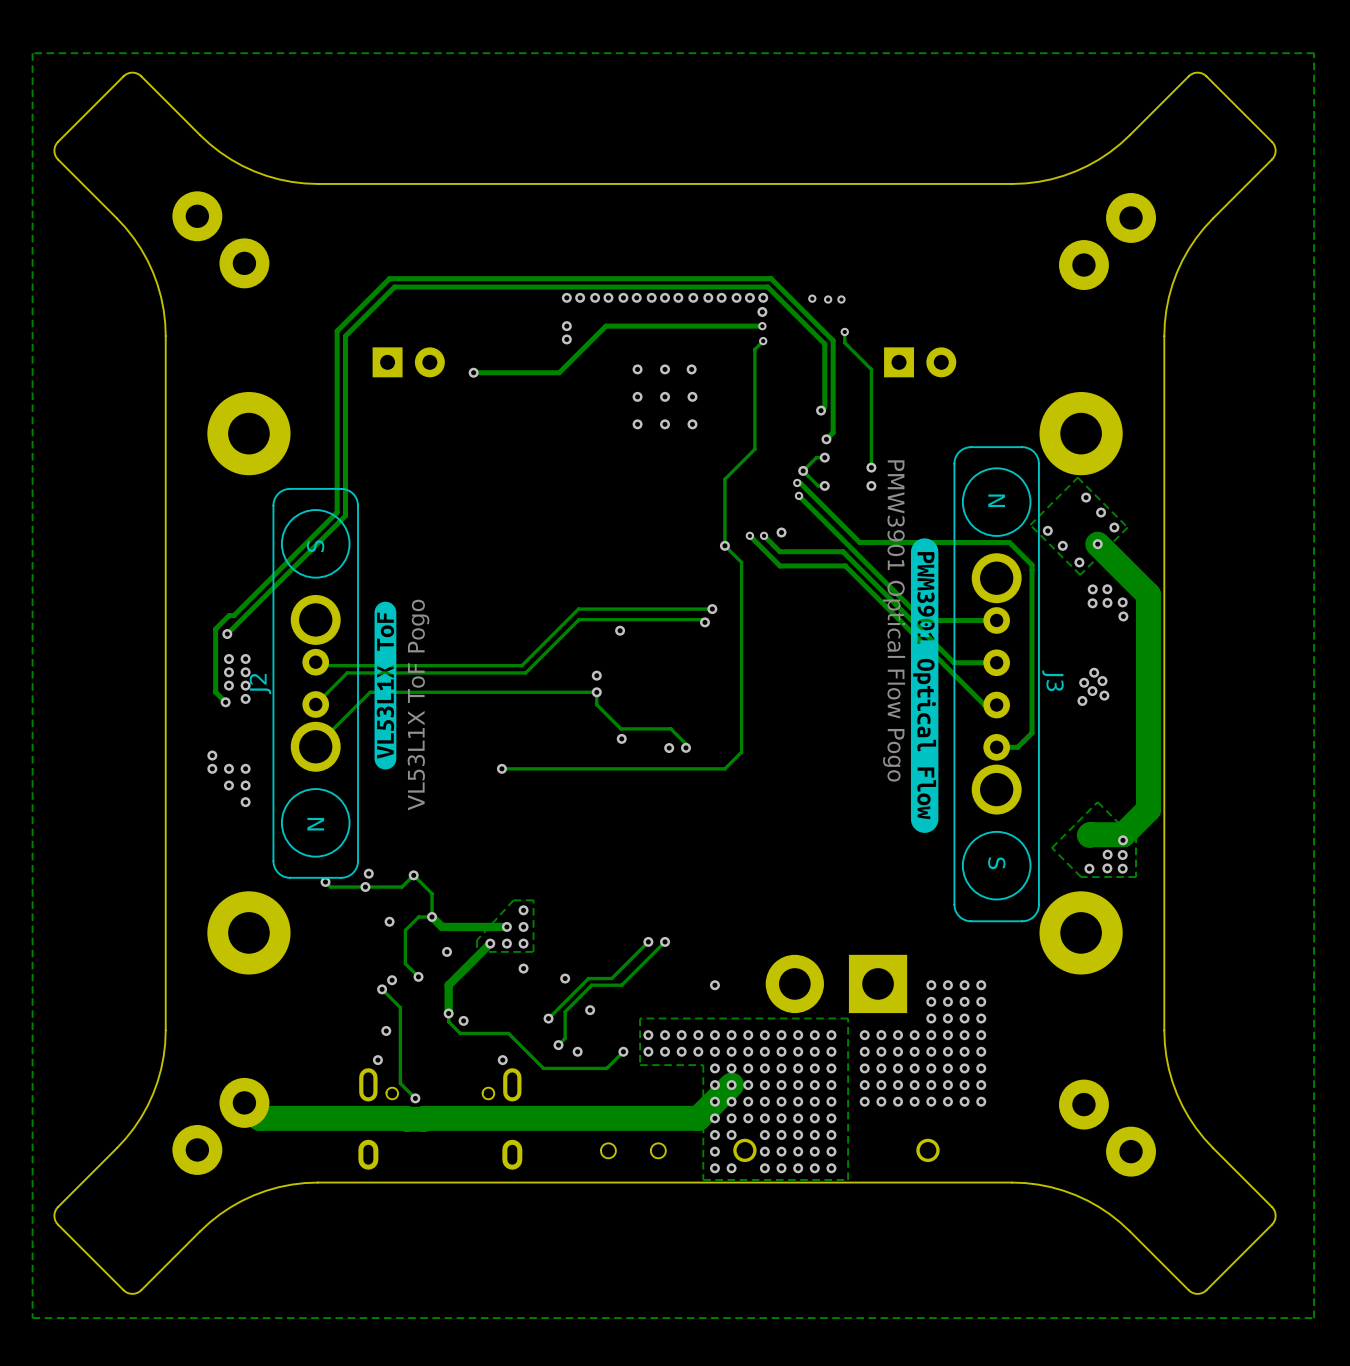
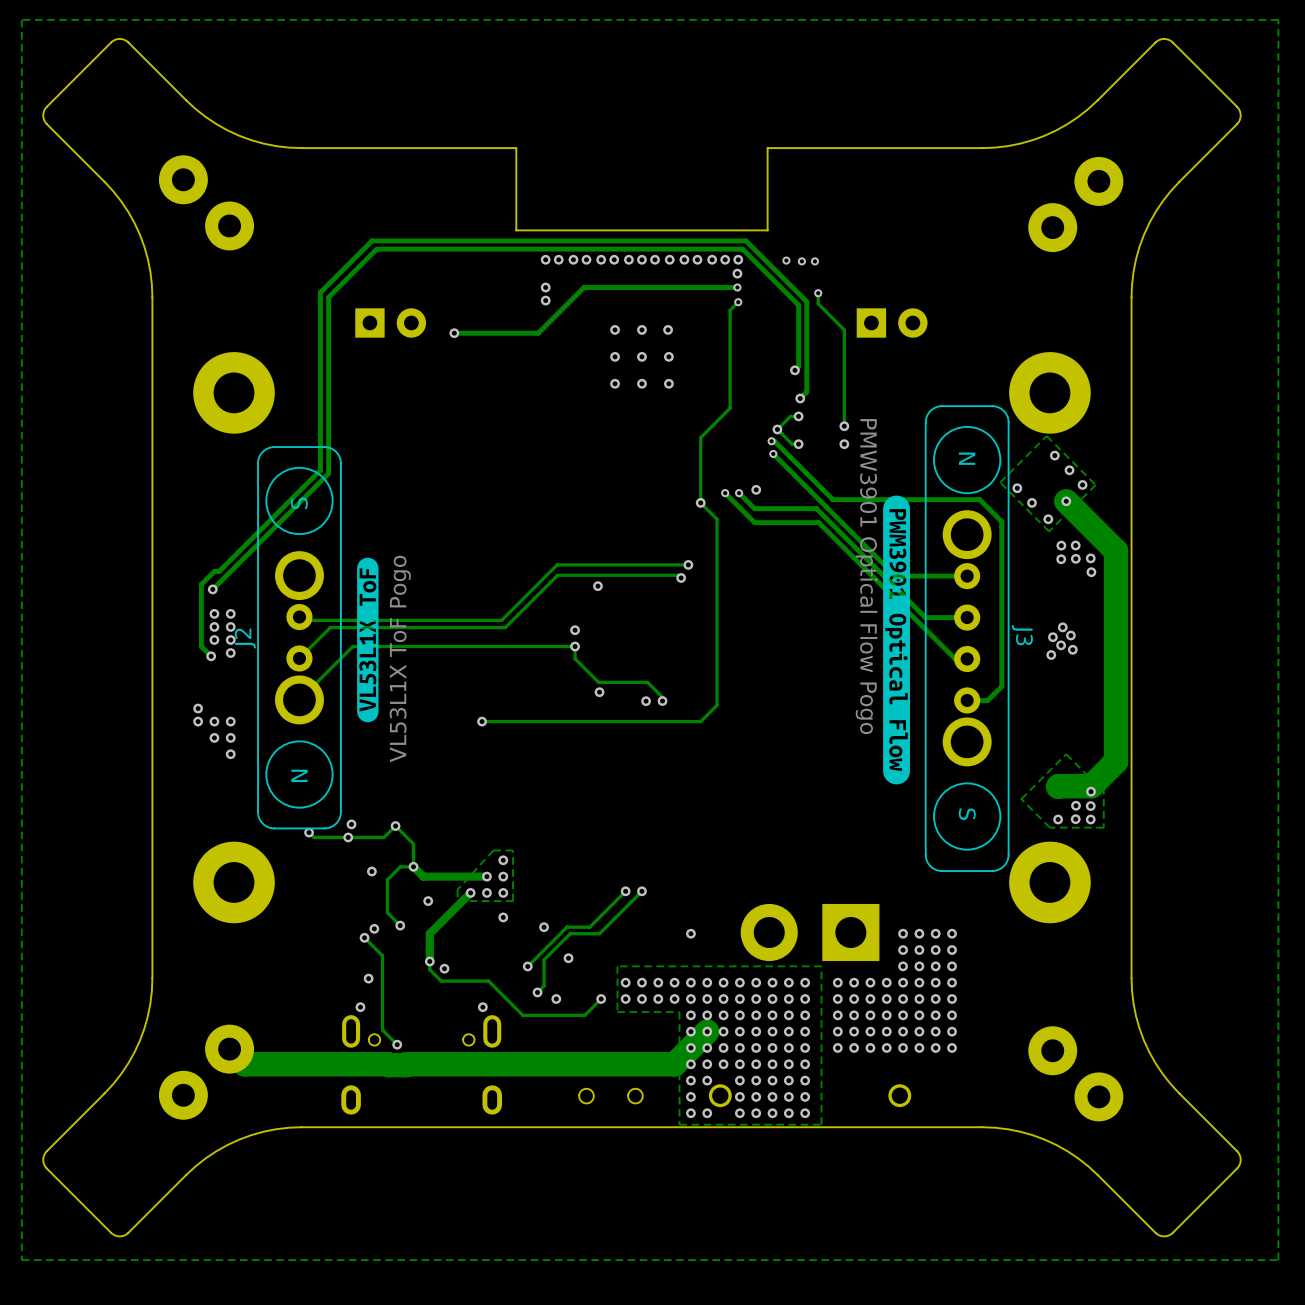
board edge: (793, 183) (536, 183) -> (767, 148) (767, 230) (516, 230) (516, 148)

